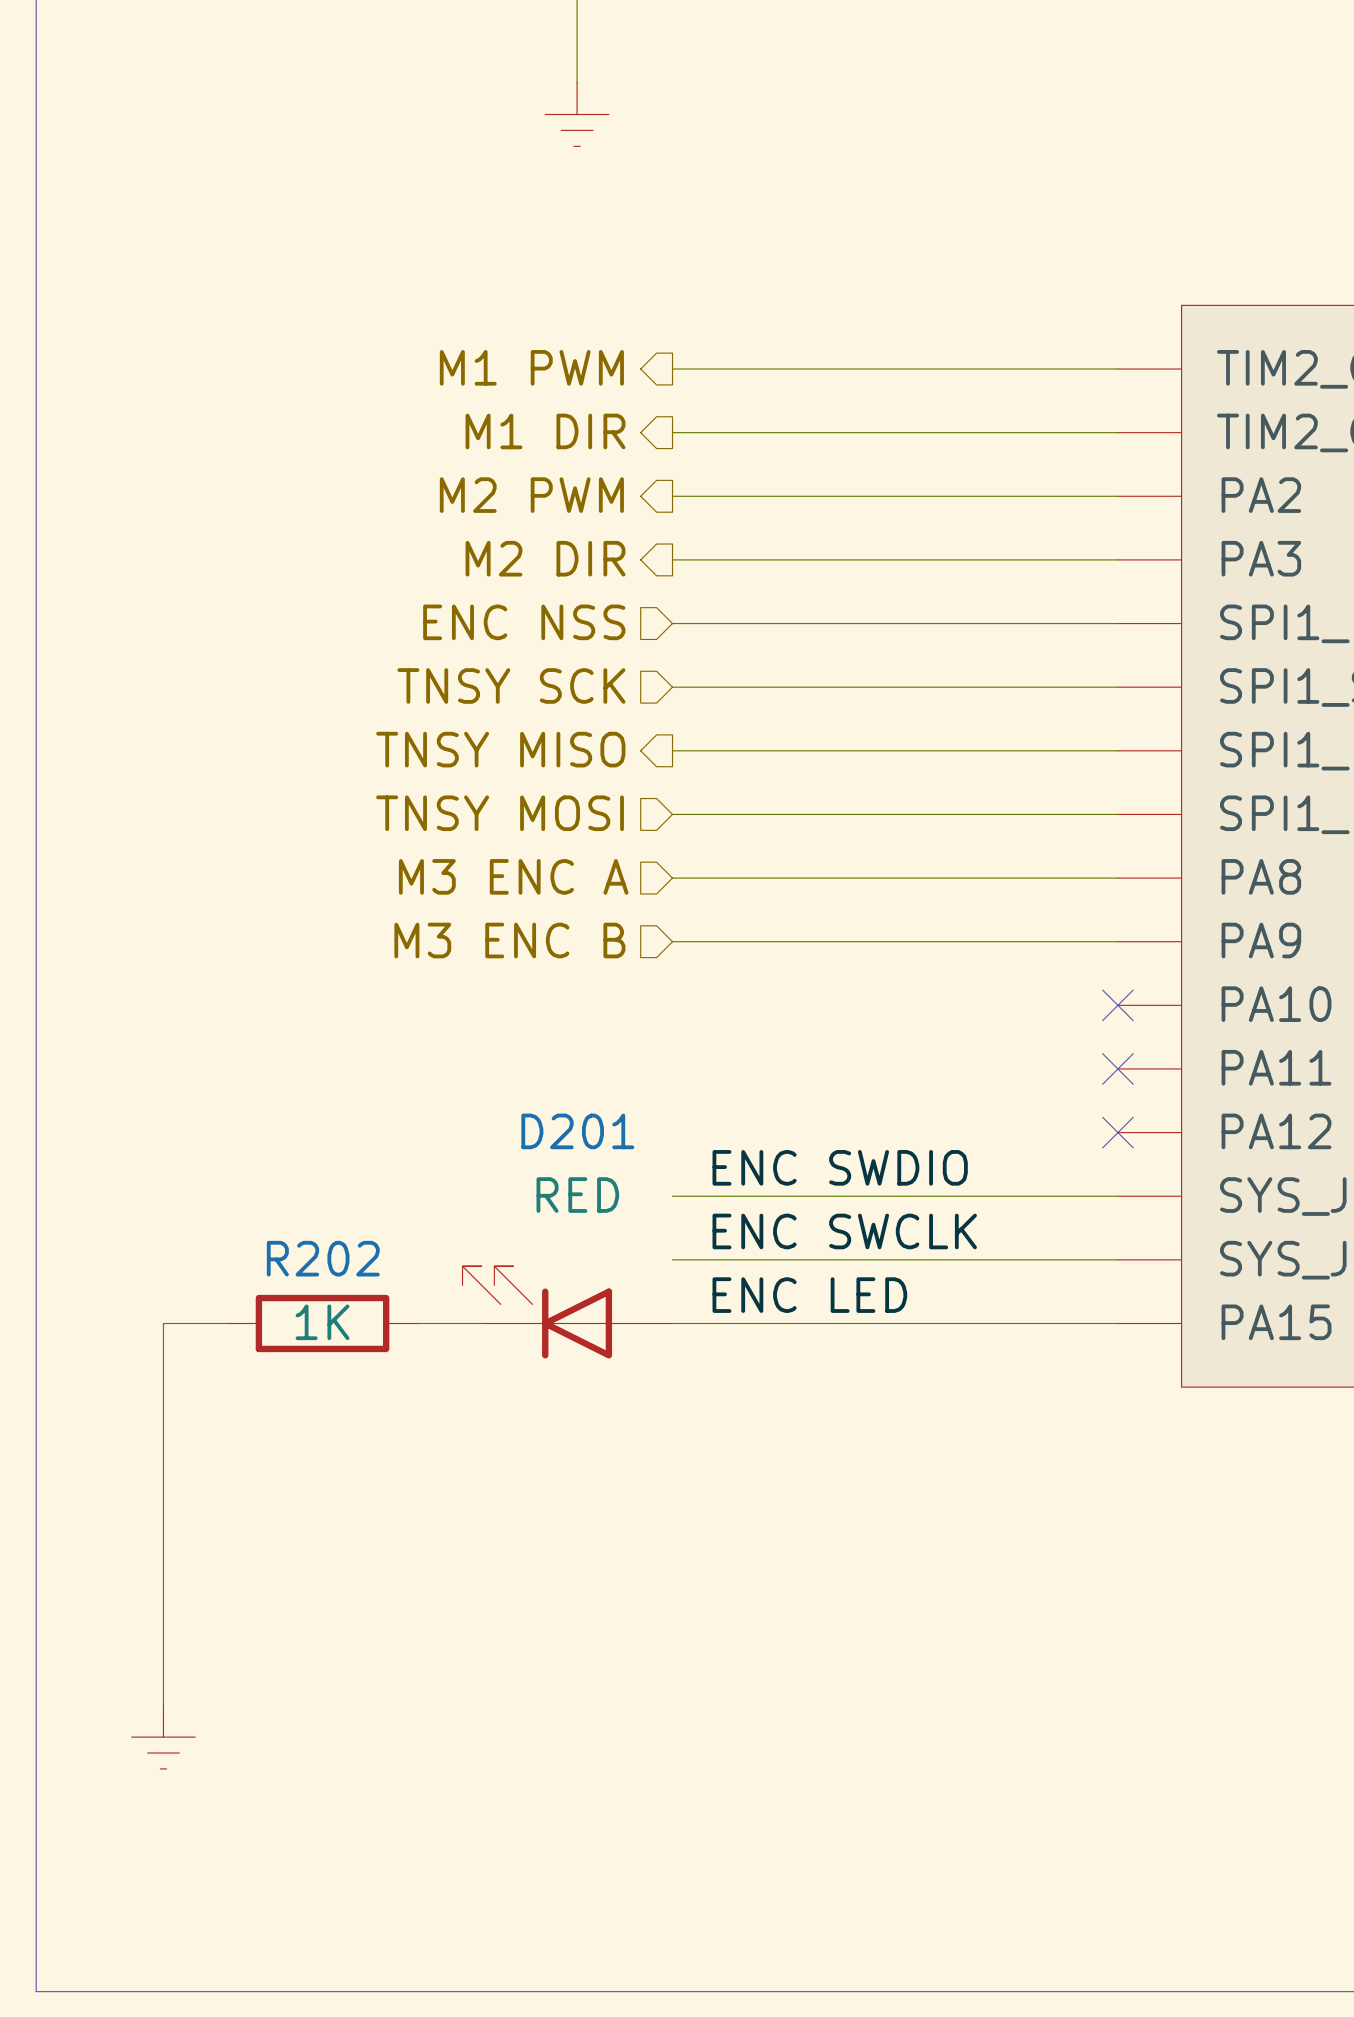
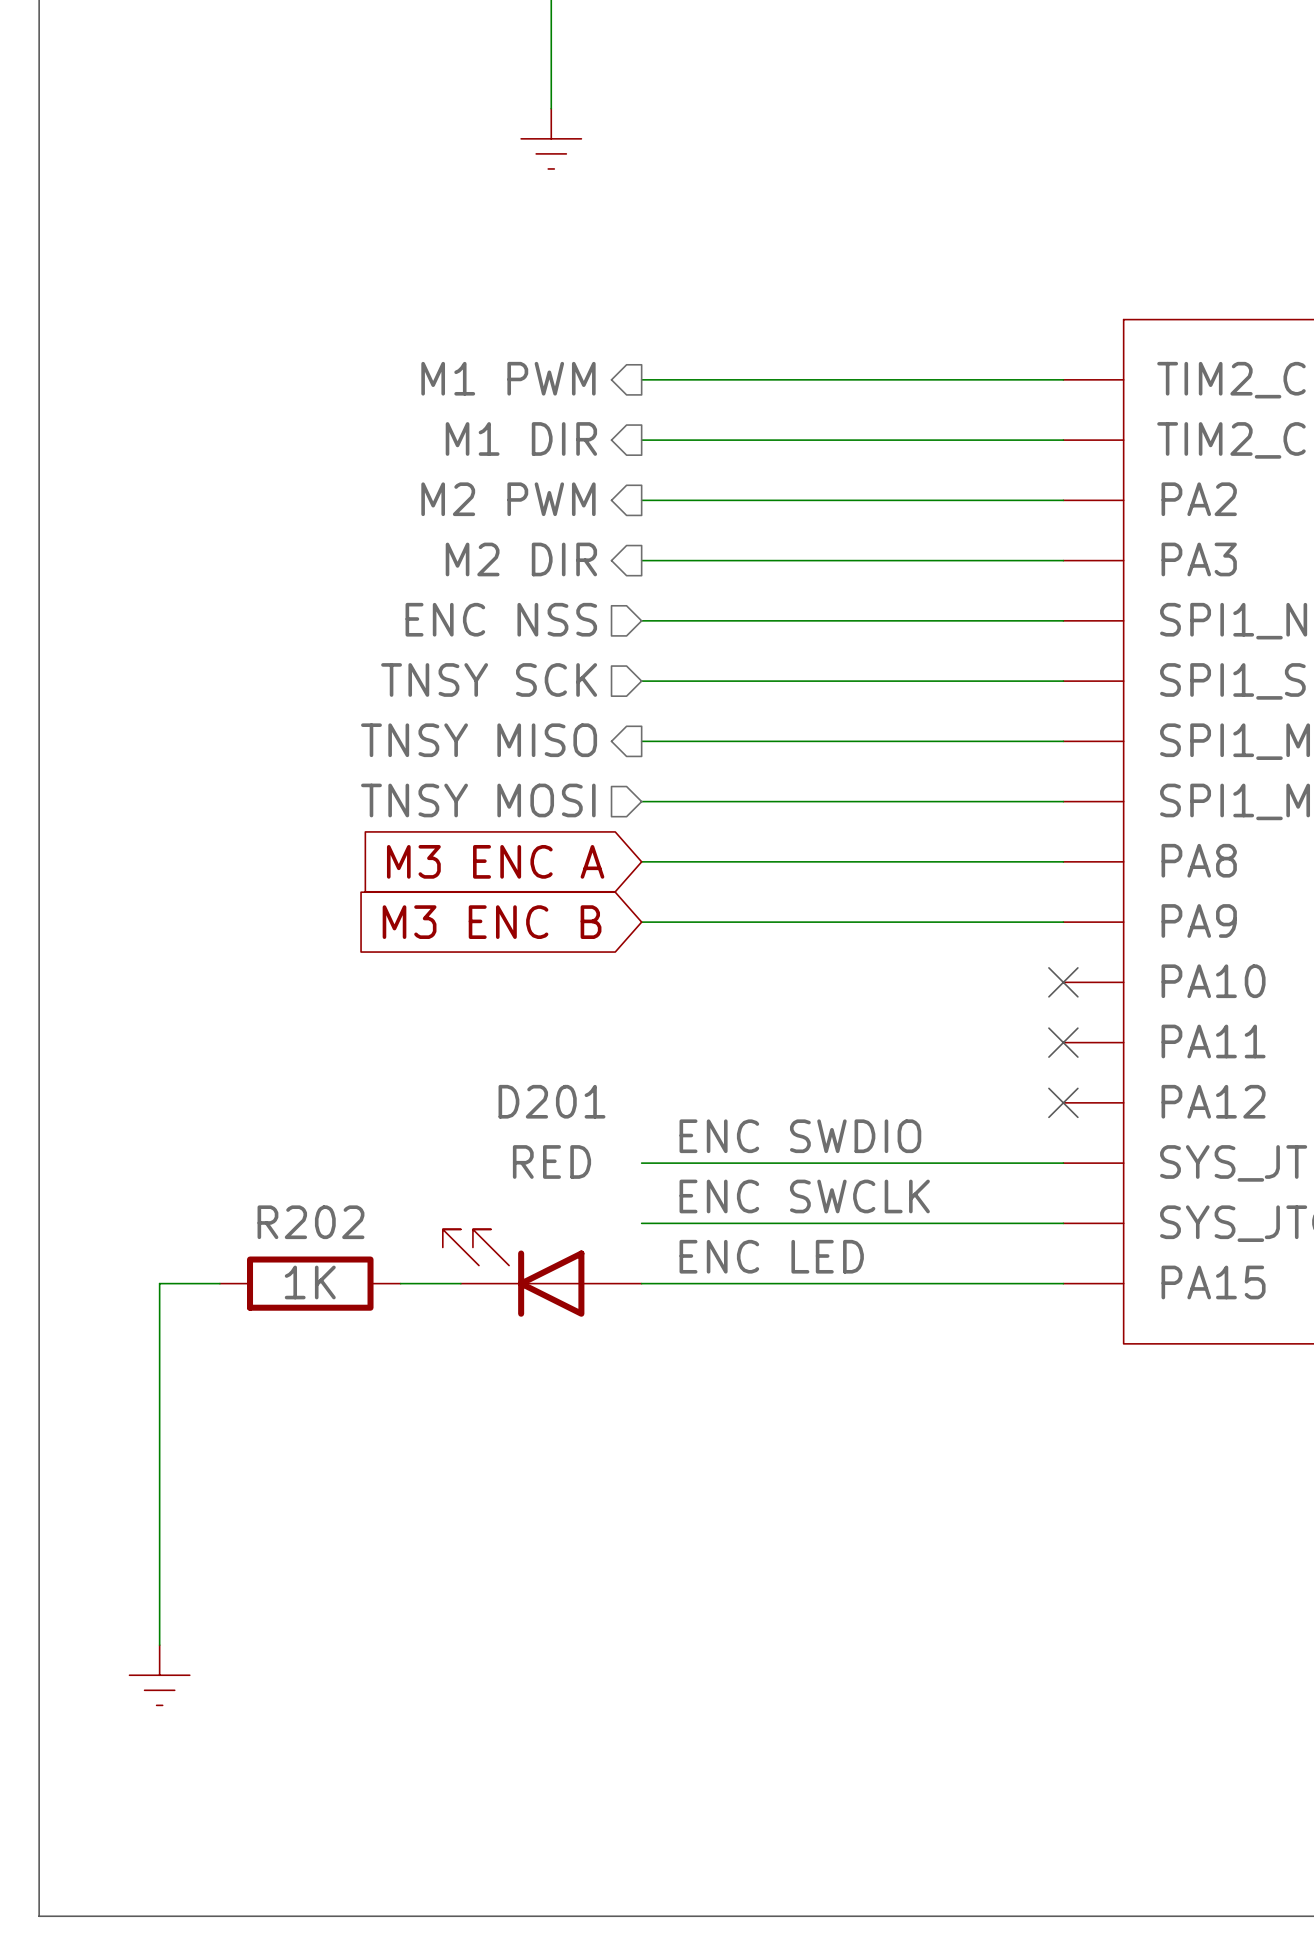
hierarchical label: M3 ENC A (513, 876) -> none
global label: none -> M3 ENC A (495, 861)
hierarchical label: M3 ENC B (509, 940) -> none
global label: none -> M3 ENC B (492, 922)

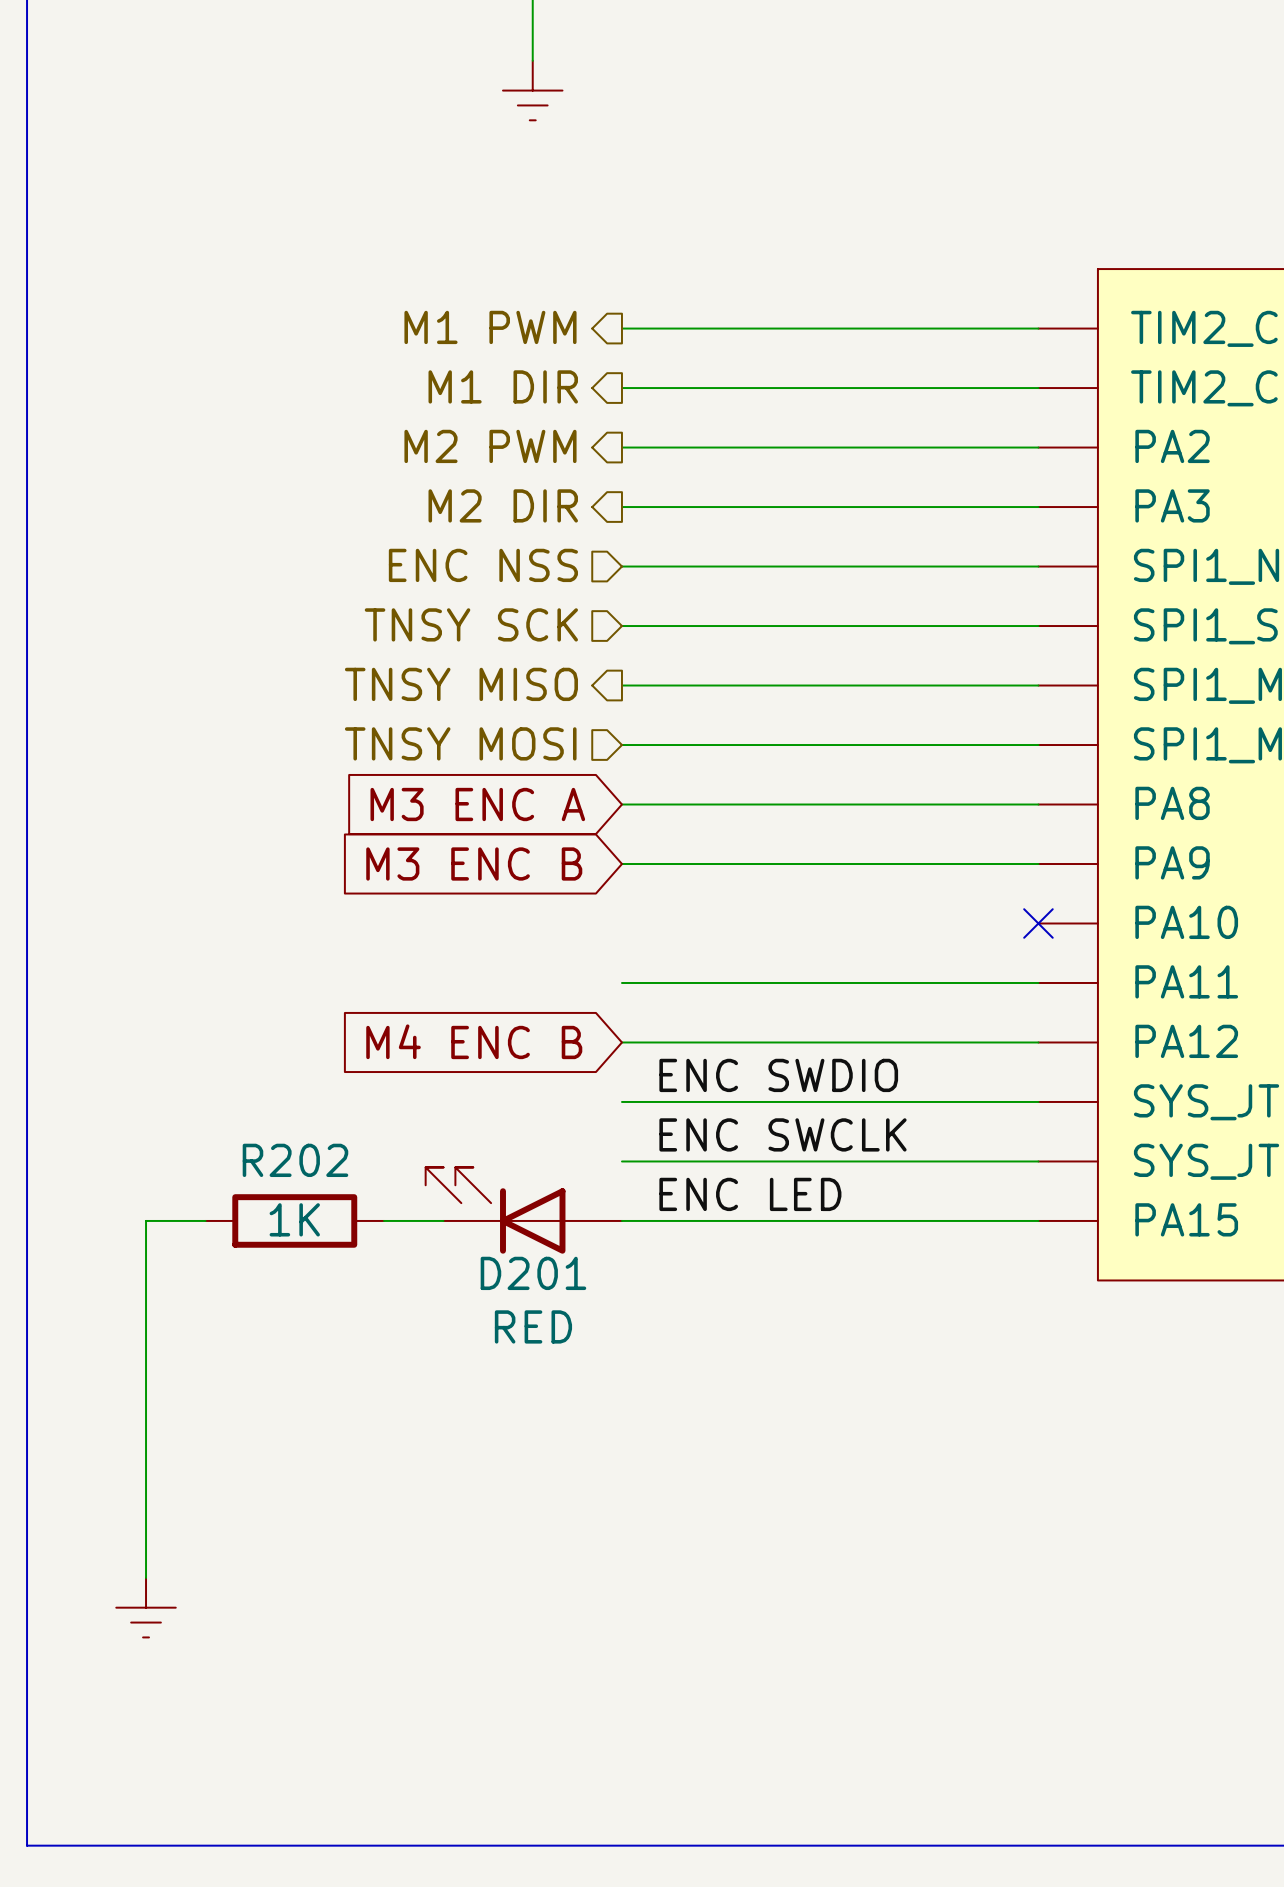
wire: none -> (621, 982) (1038, 982)
no-connect mark: (1063, 1042) -> none
D201 name position: D201 (551, 1101) -> D201 (533, 1273)
global label: none -> M4 ENC B (474, 1041)
wire: none -> (621, 1042) (1038, 1042)
no-connect mark: (1063, 1102) -> none
D201 value position: RED (551, 1161) -> RED (533, 1326)

